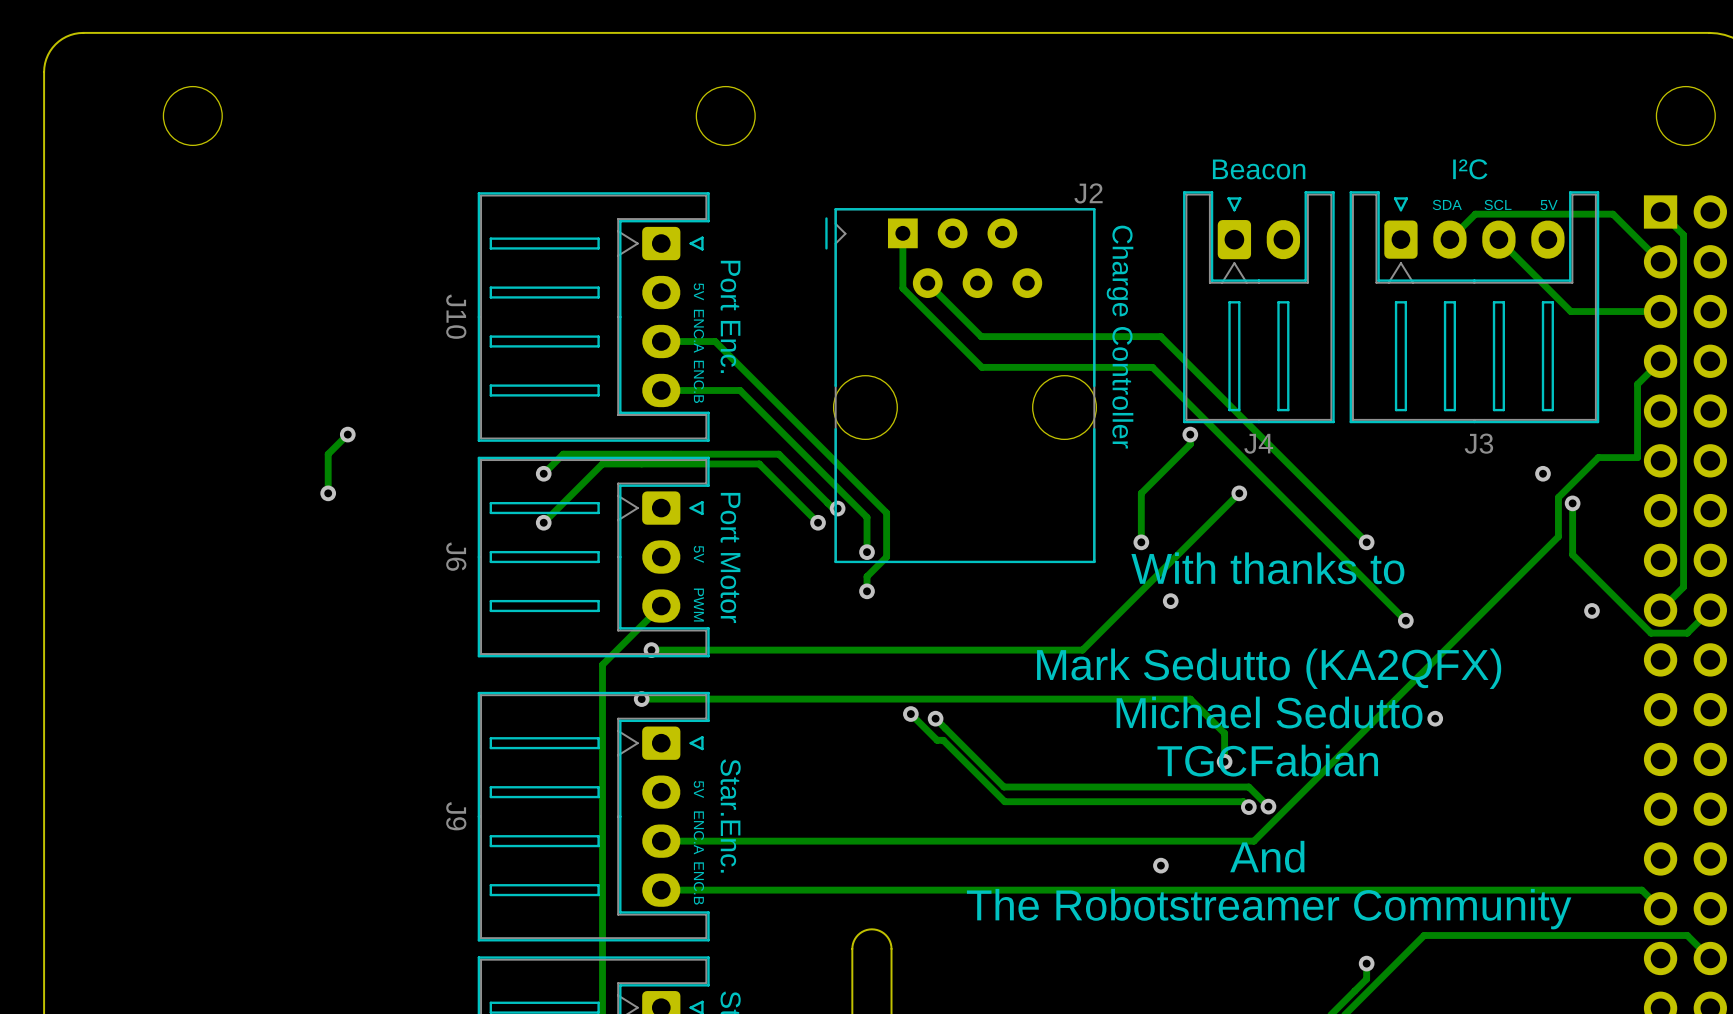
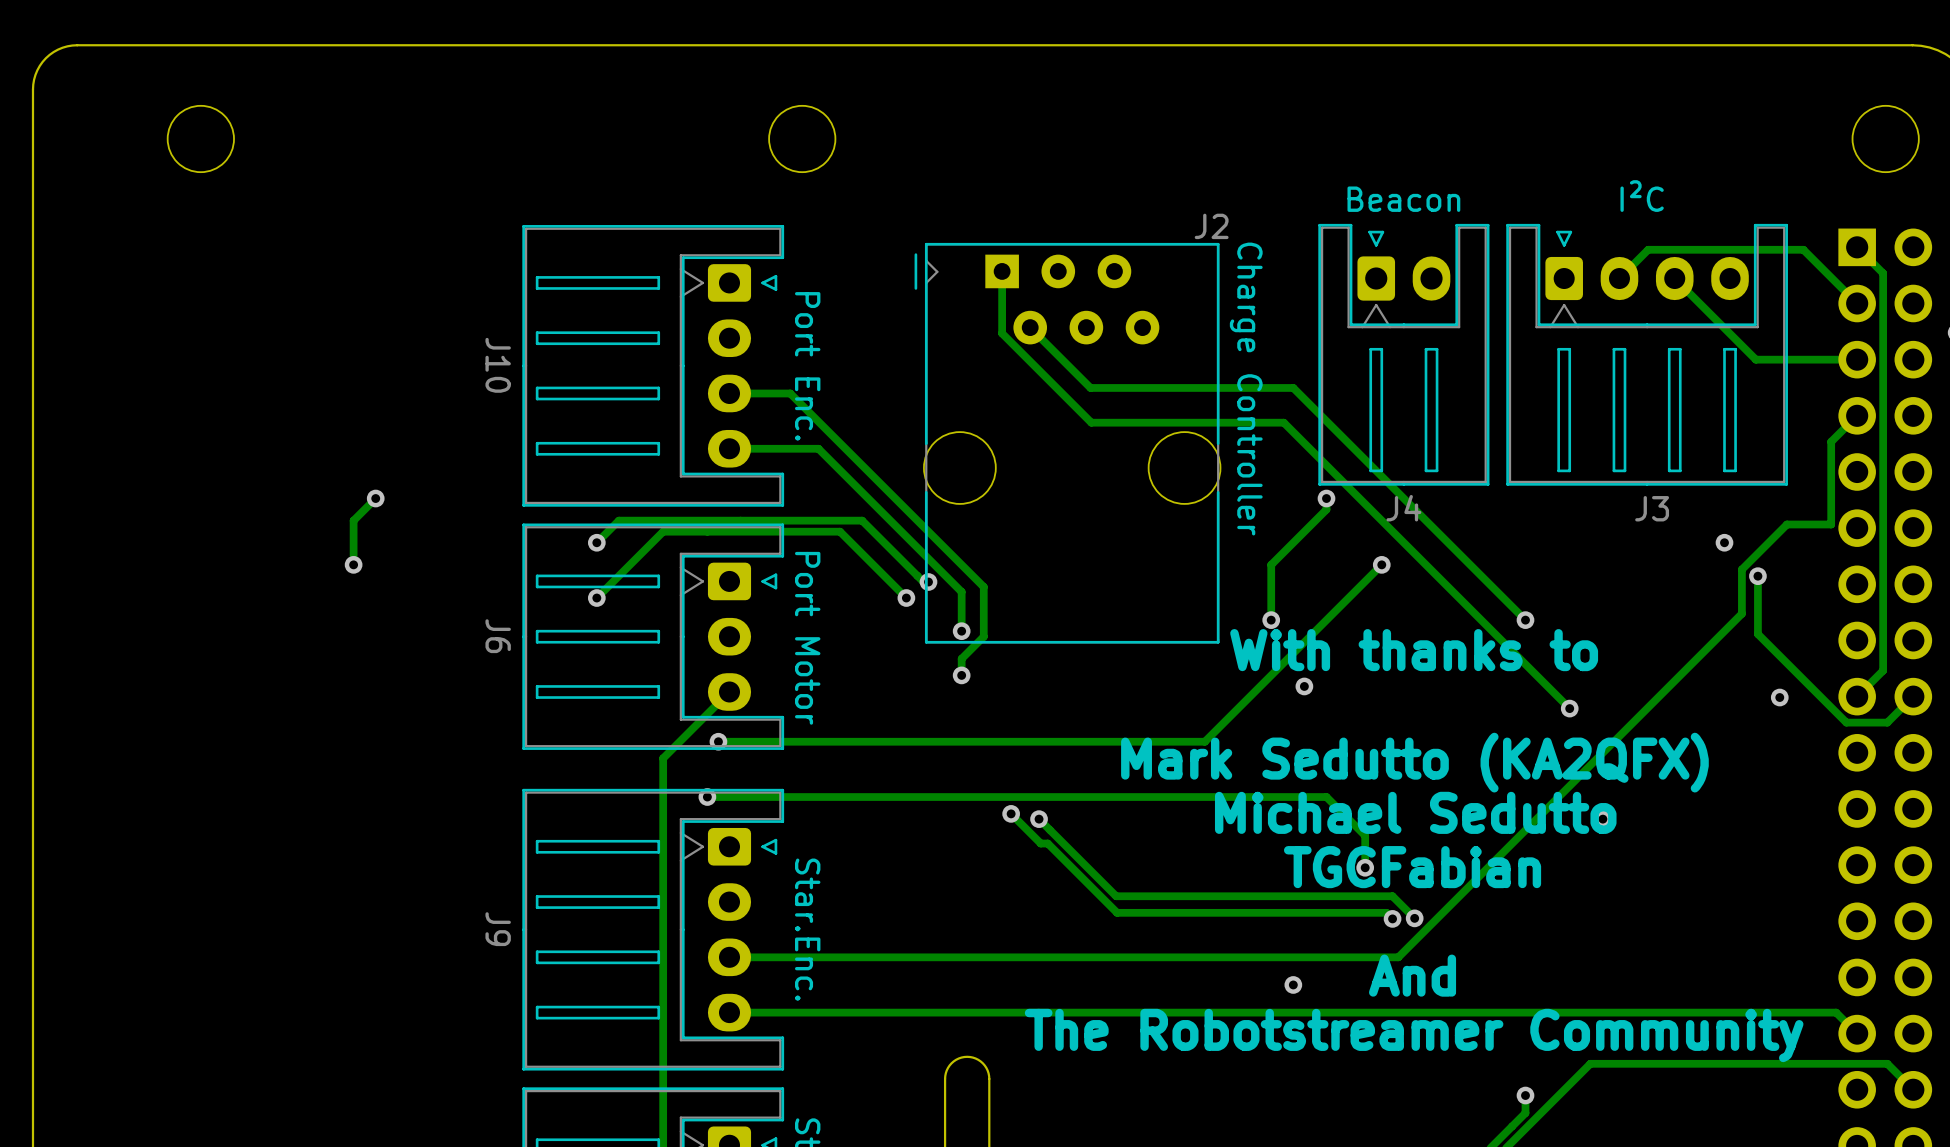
text: SDA (1447, 204) -> none
text: SCL (1498, 204) -> none
text: 5V (1549, 205) -> none
text: 5V (698, 291) -> none
text: ENC.A (698, 331) -> none
text: ENC.B (698, 381) -> none
text: 5V (698, 554) -> none
text: PWM (698, 605) -> none
text: 5V (698, 789) -> none
text: ENC.A (698, 832) -> none
text: ENC.B (698, 883) -> none

